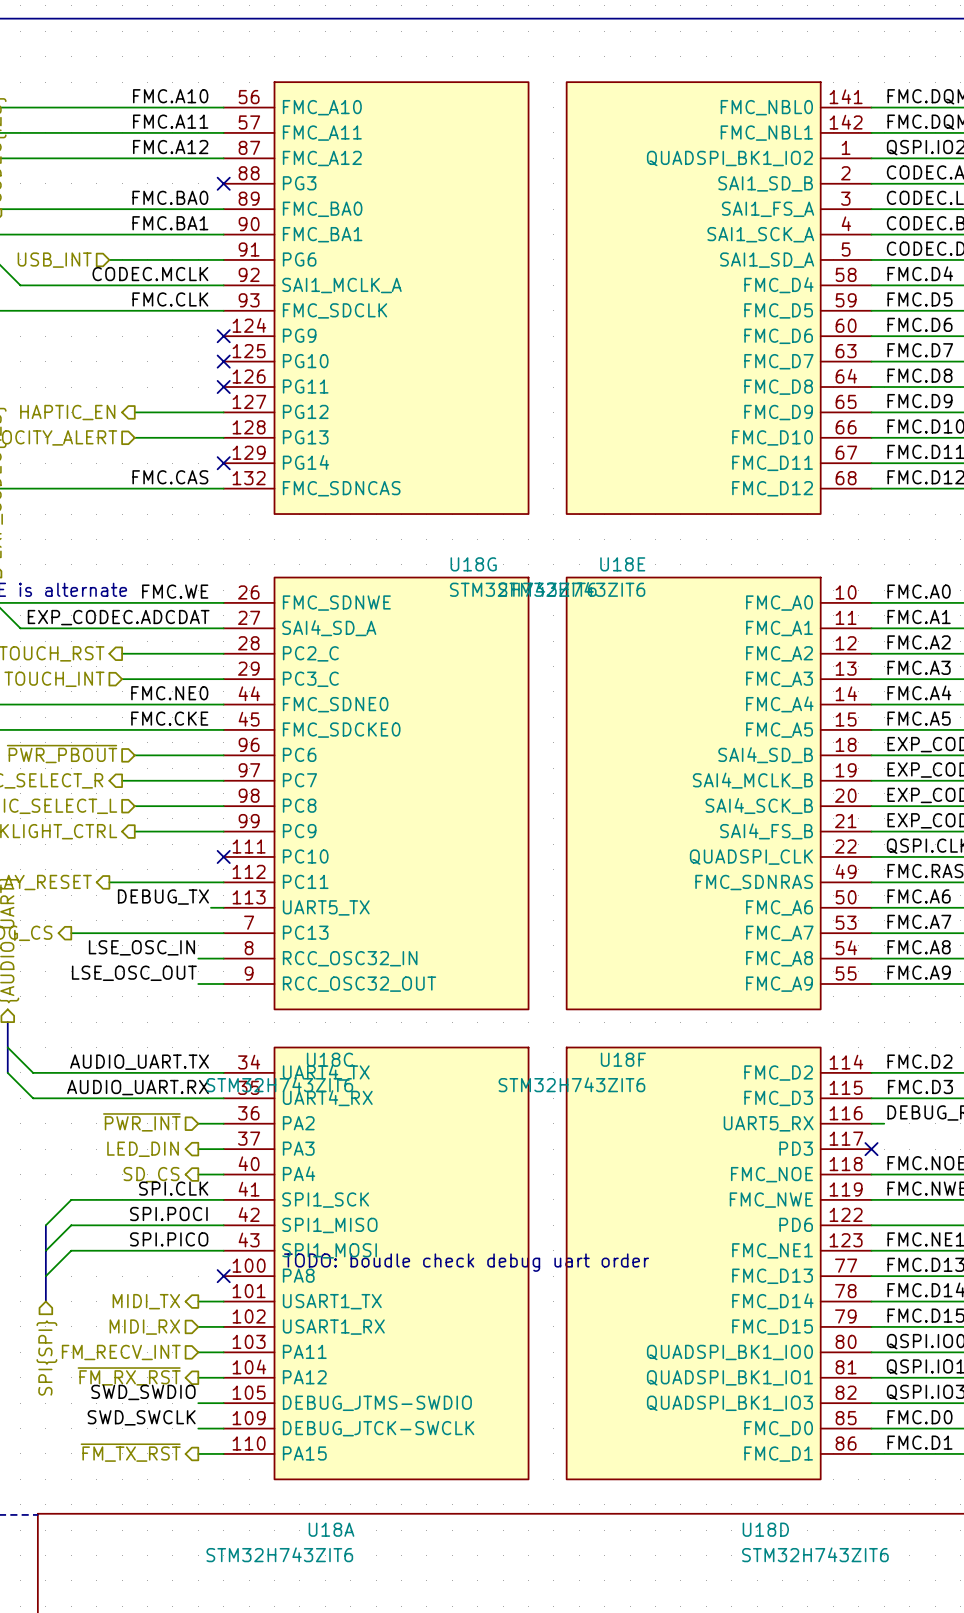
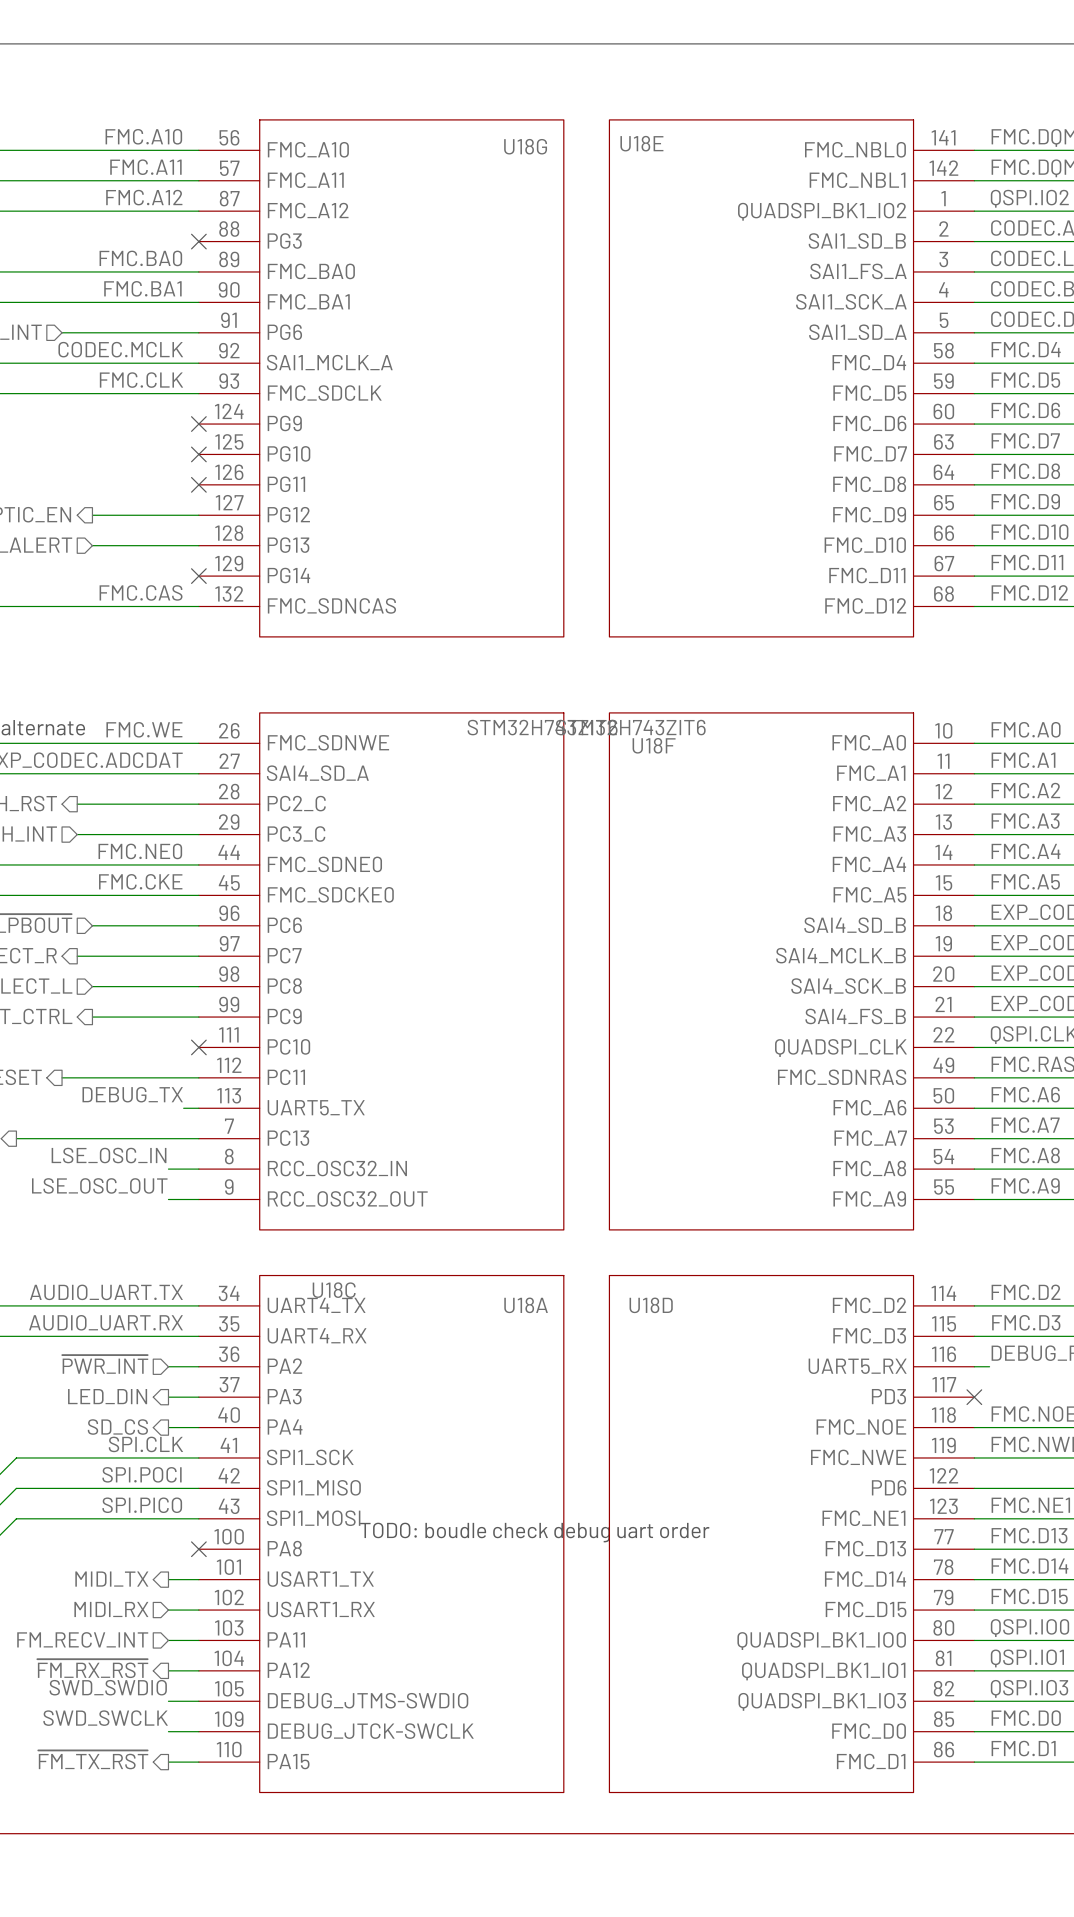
U18G name position: U18G (473, 564) -> U18G (525, 146)
U18E name position: U18E (622, 564) -> U18E (641, 143)
U18F name position: U18F (623, 1059) -> U18F (654, 745)
U18C value: STM32H743ZIT6 (279, 1084) -> none
U18F value: STM32H743ZIT6 (571, 1084) -> none
U18A name position: U18A (331, 1529) -> U18A (526, 1305)
U18D name position: U18D (765, 1529) -> U18D (651, 1305)
U18A value: STM32H743ZIT6 (279, 1554) -> none
U18D value: STM32H743ZIT6 (815, 1554) -> none

